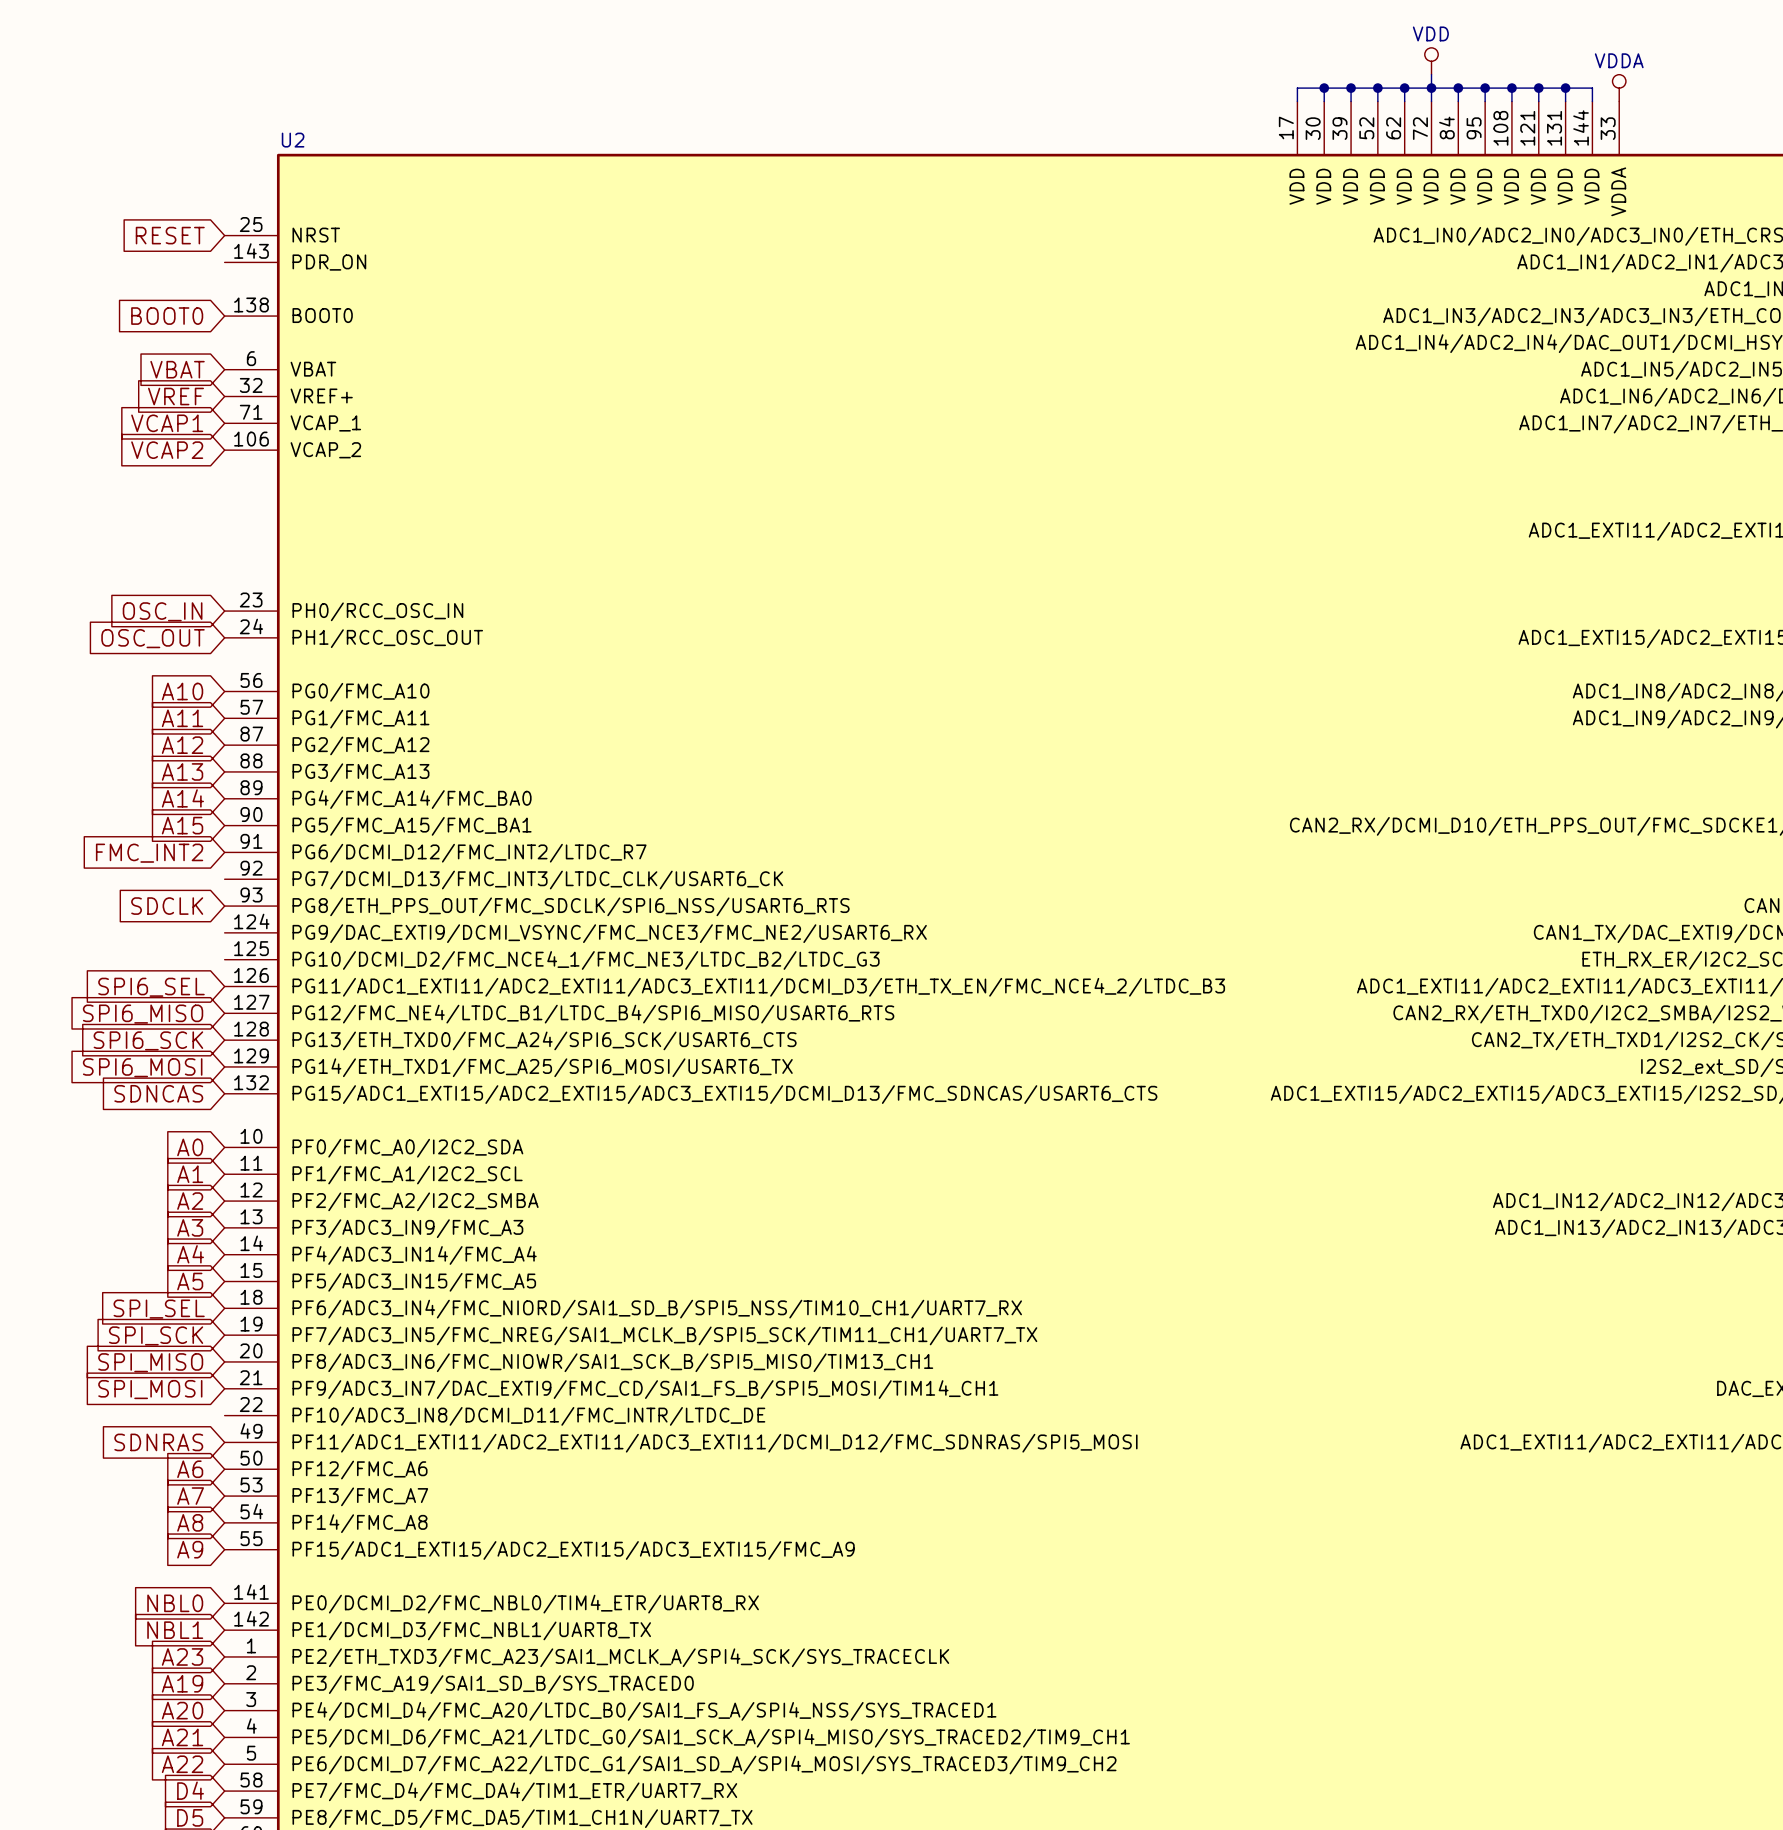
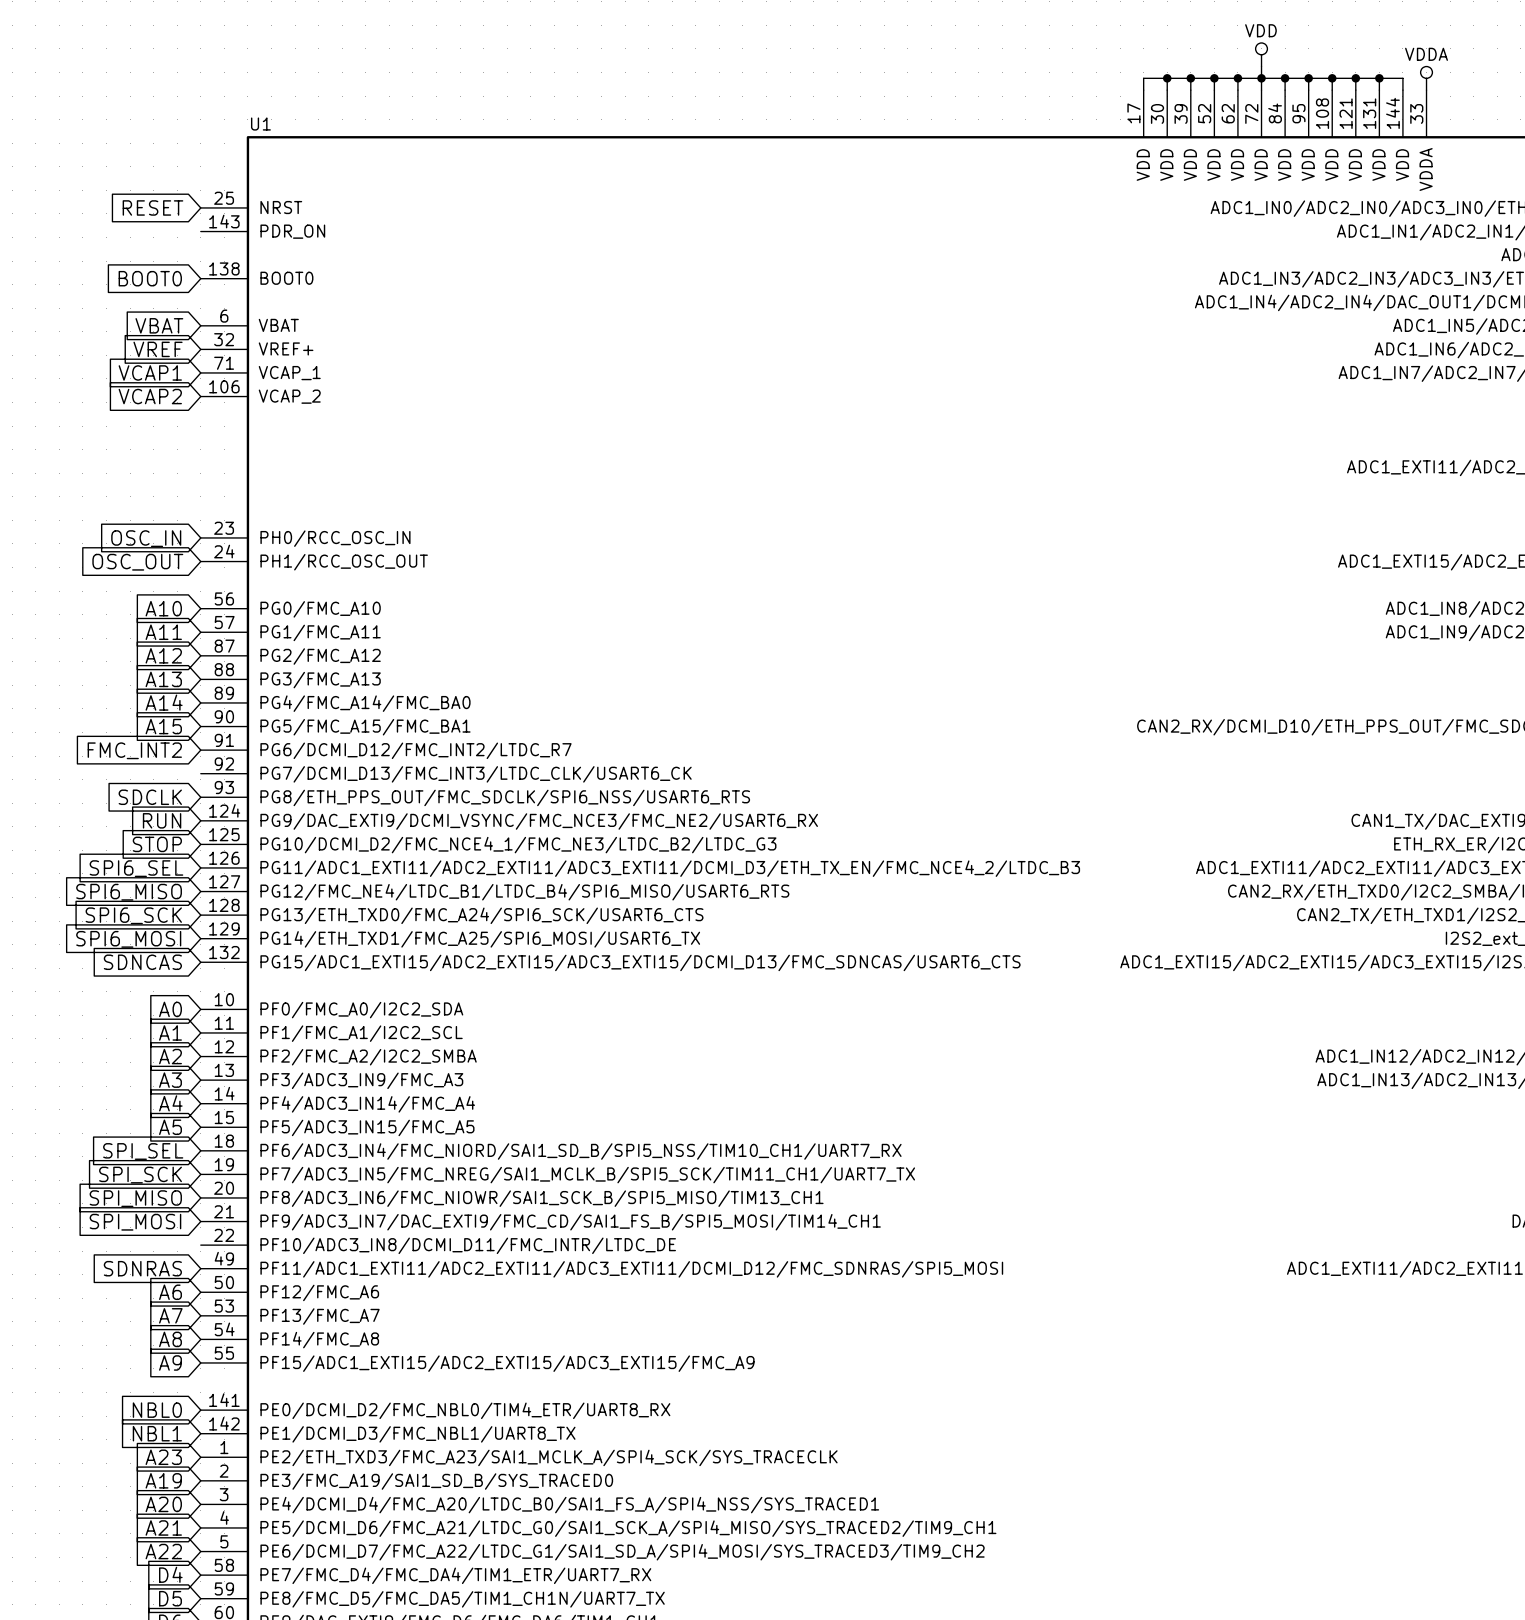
U2 name: U2 (293, 140) -> U1 (260, 124)
global label: none -> RUN (162, 820)
global label: none -> STOP (157, 844)

